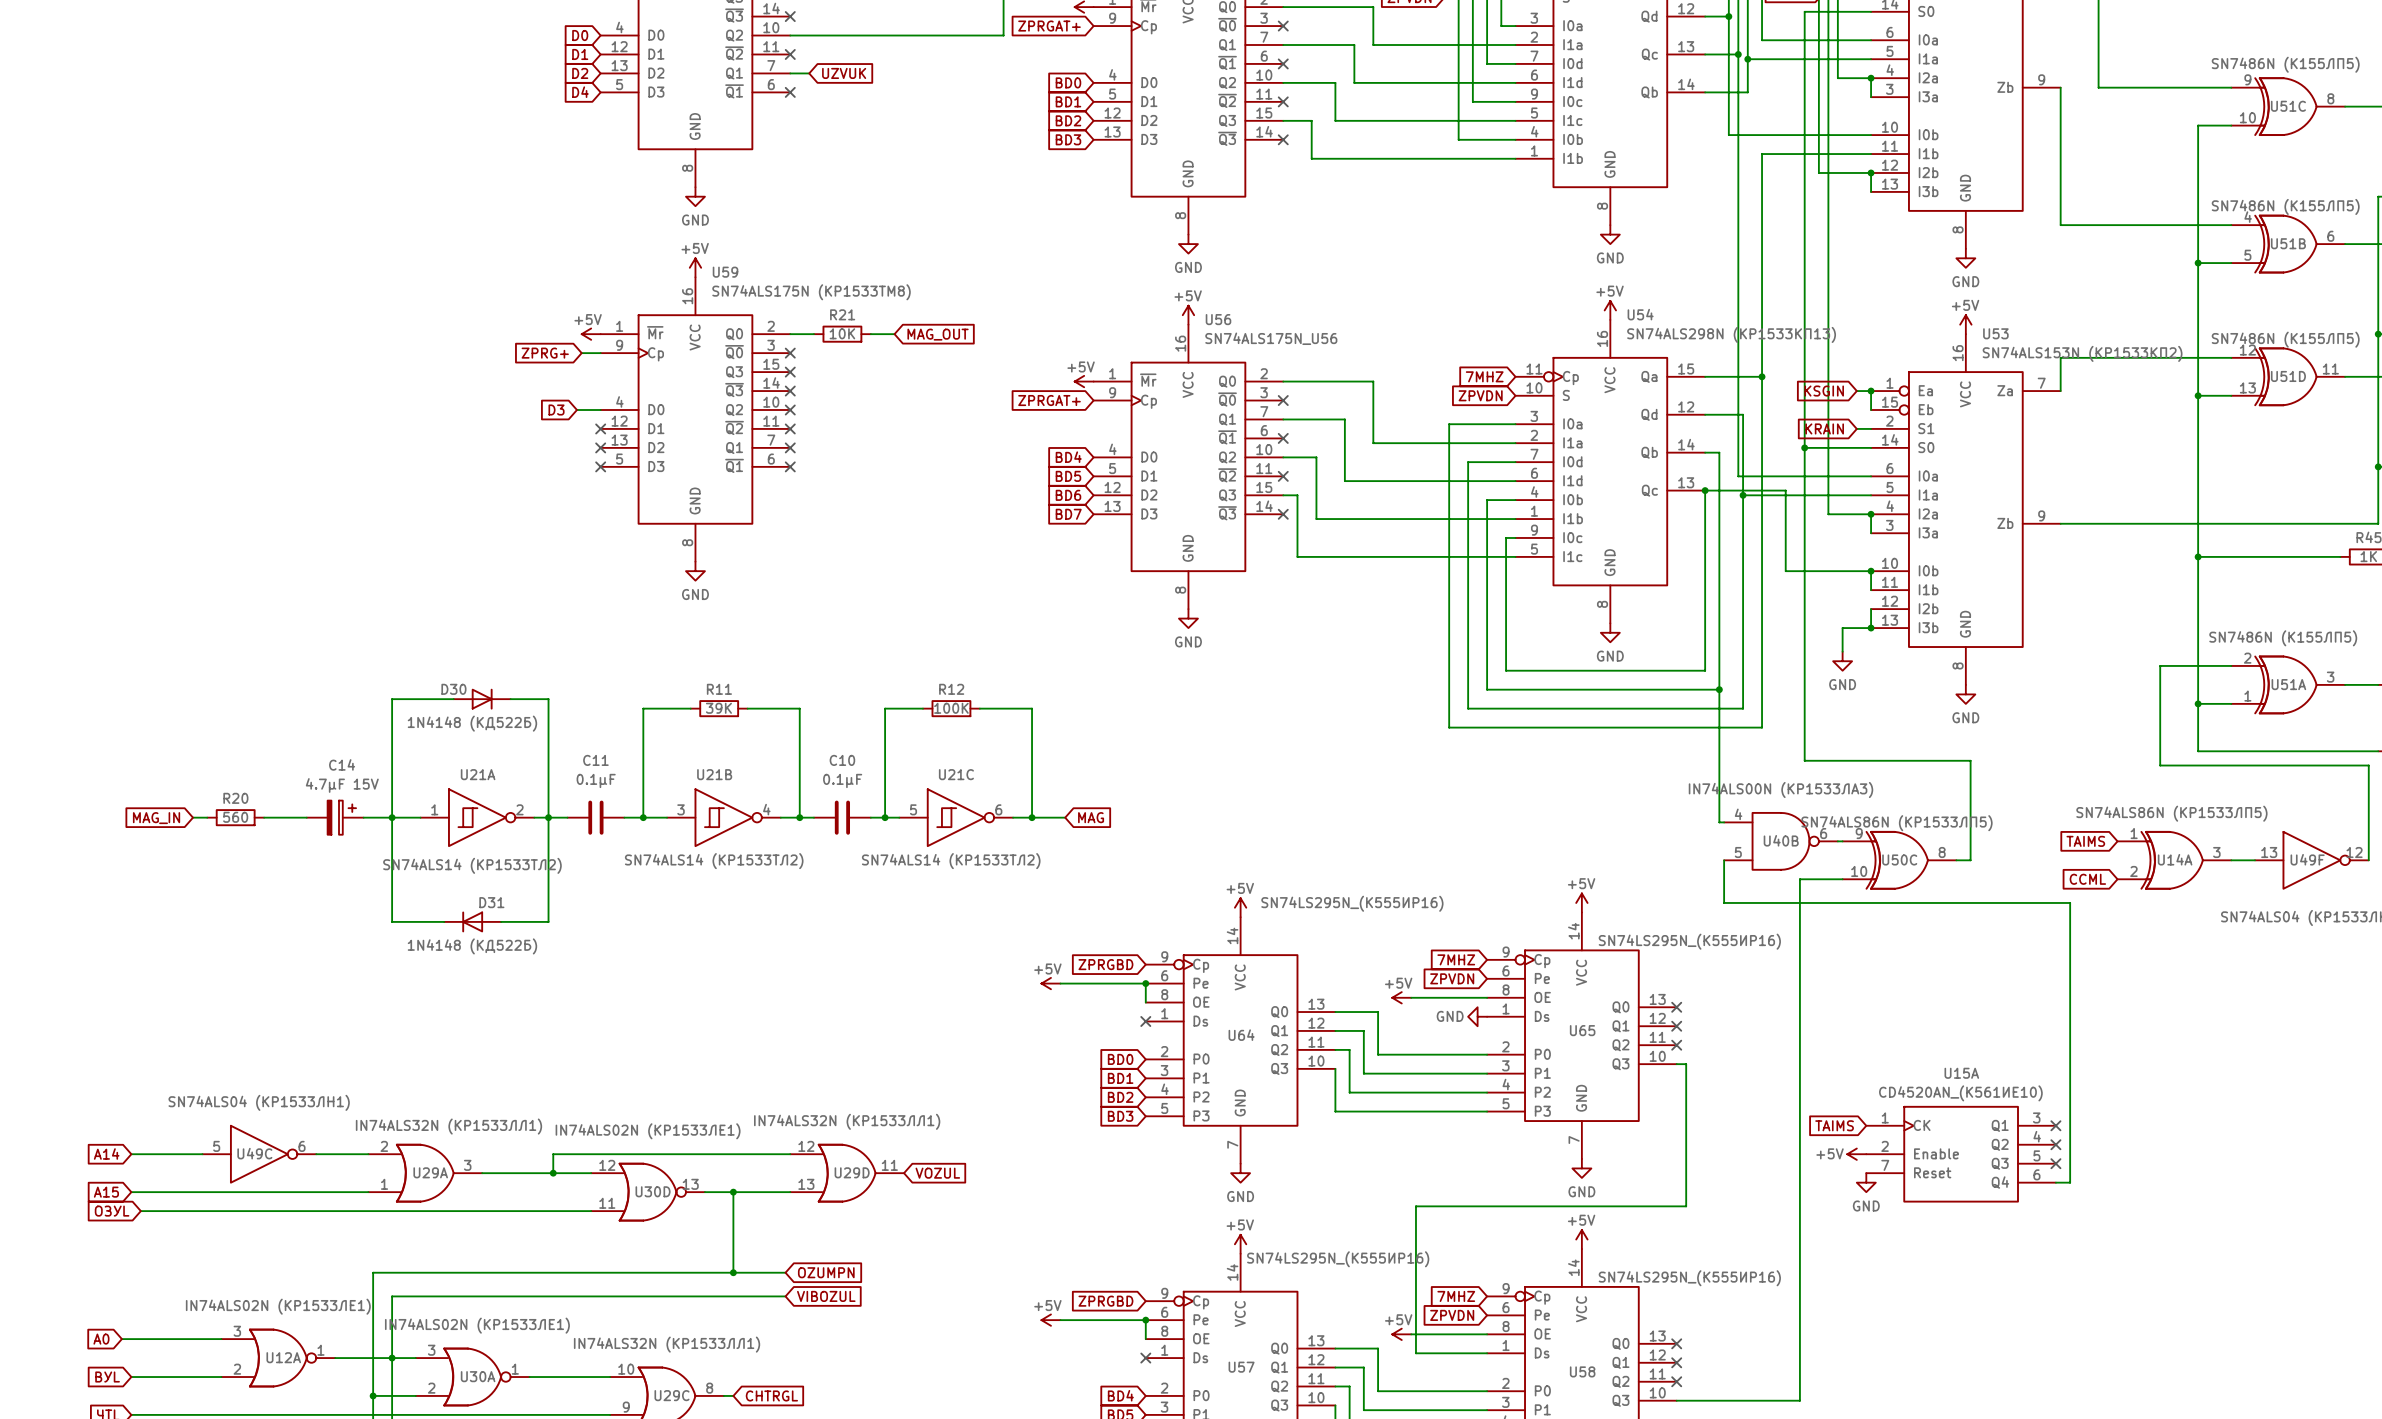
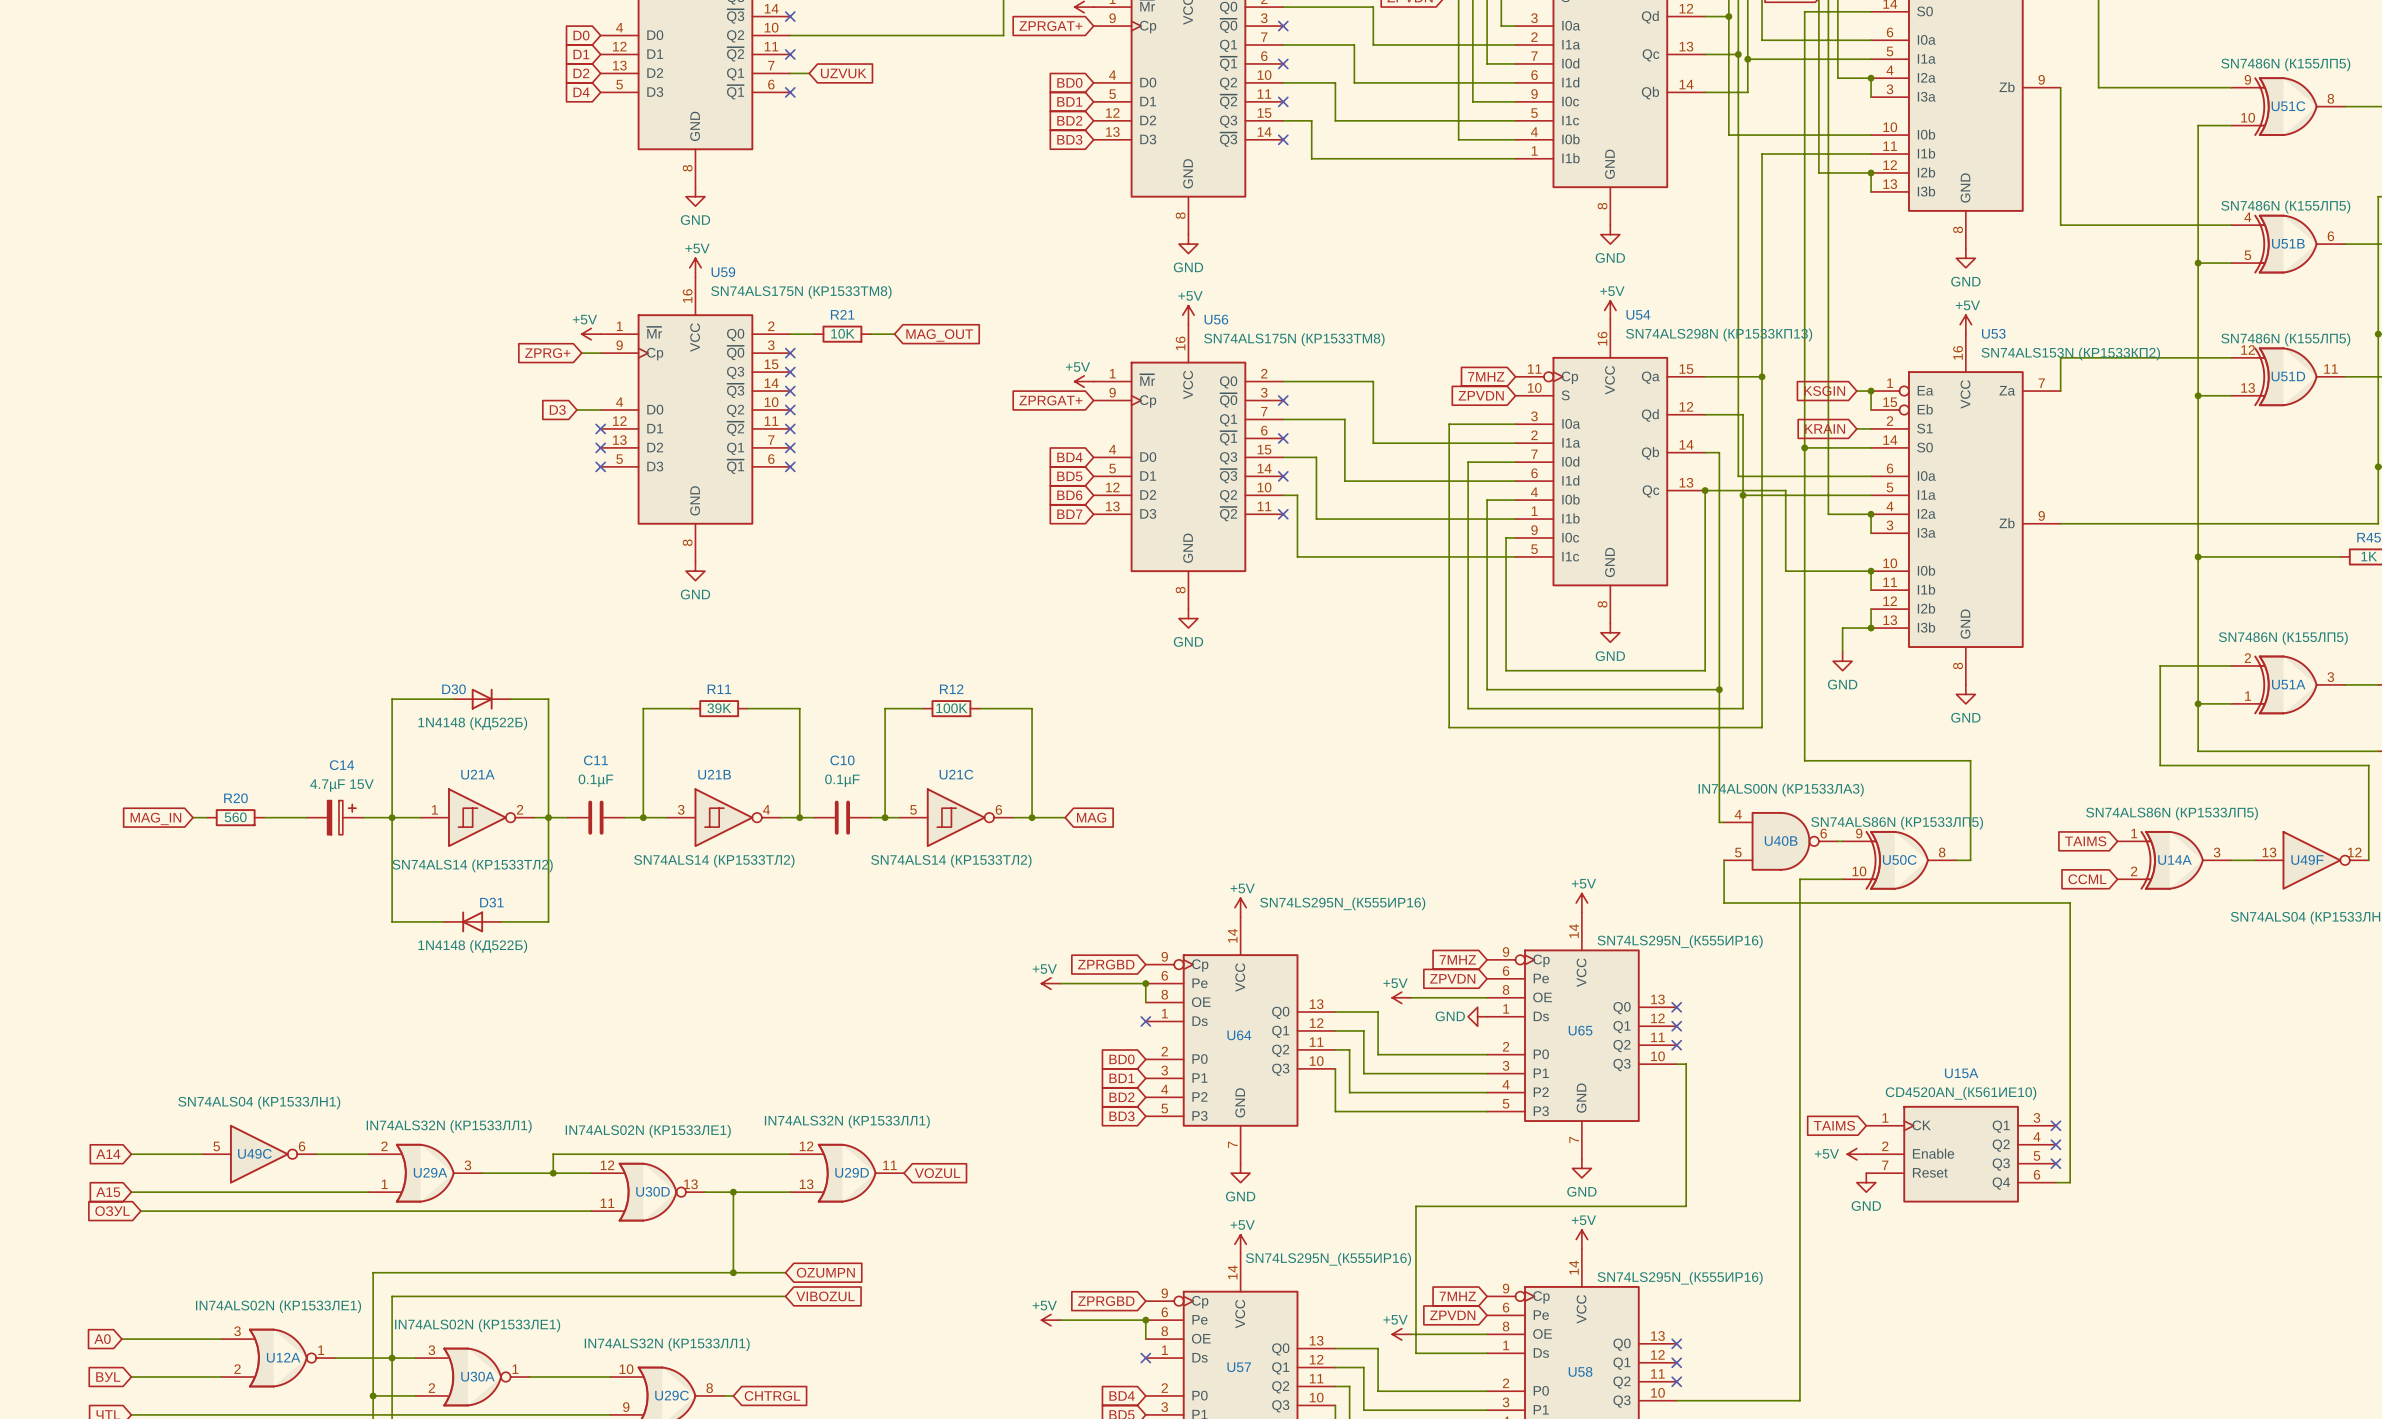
U56 value: SN74ALS175N_U56 (1271, 338) -> SN74ALS175N (КР1533ТМ8) (1294, 339)
U56 pin number: 10 (1264, 449) -> 15 (1264, 449)
U56 pin name: Q2 (1227, 457) -> Q3 (1228, 458)
U56 pin number: 11 (1264, 468) -> 14 (1264, 468)
U56 pin name: ~{Q2} (1227, 475) -> ~{Q3} (1228, 476)
U56 pin number: 15 (1264, 487) -> 10 (1264, 487)
U56 pin name: Q3 (1227, 495) -> Q2 (1228, 496)
U56 pin number: 14 (1264, 506) -> 11 (1264, 506)
U56 pin name: ~{Q3} (1227, 513) -> ~{Q2} (1228, 514)

